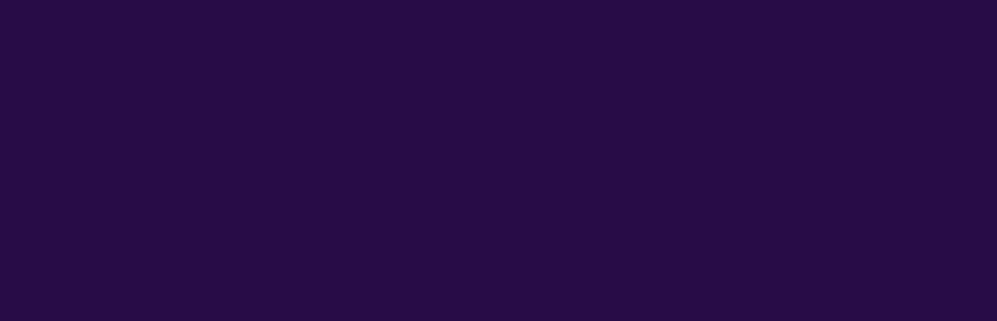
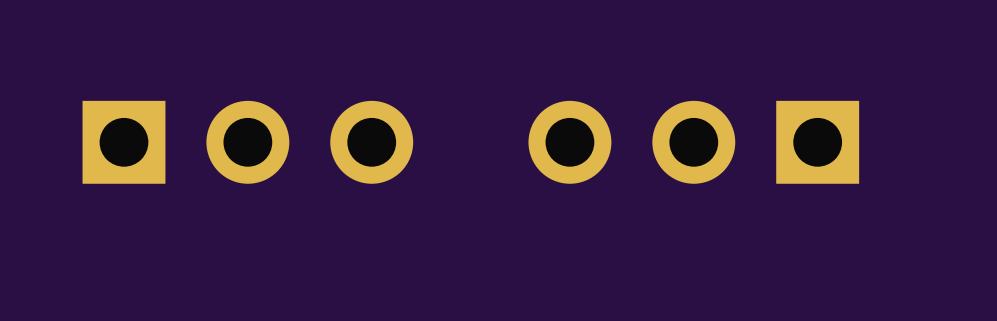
part: none -> (247, 142)
part: none -> (693, 142)

